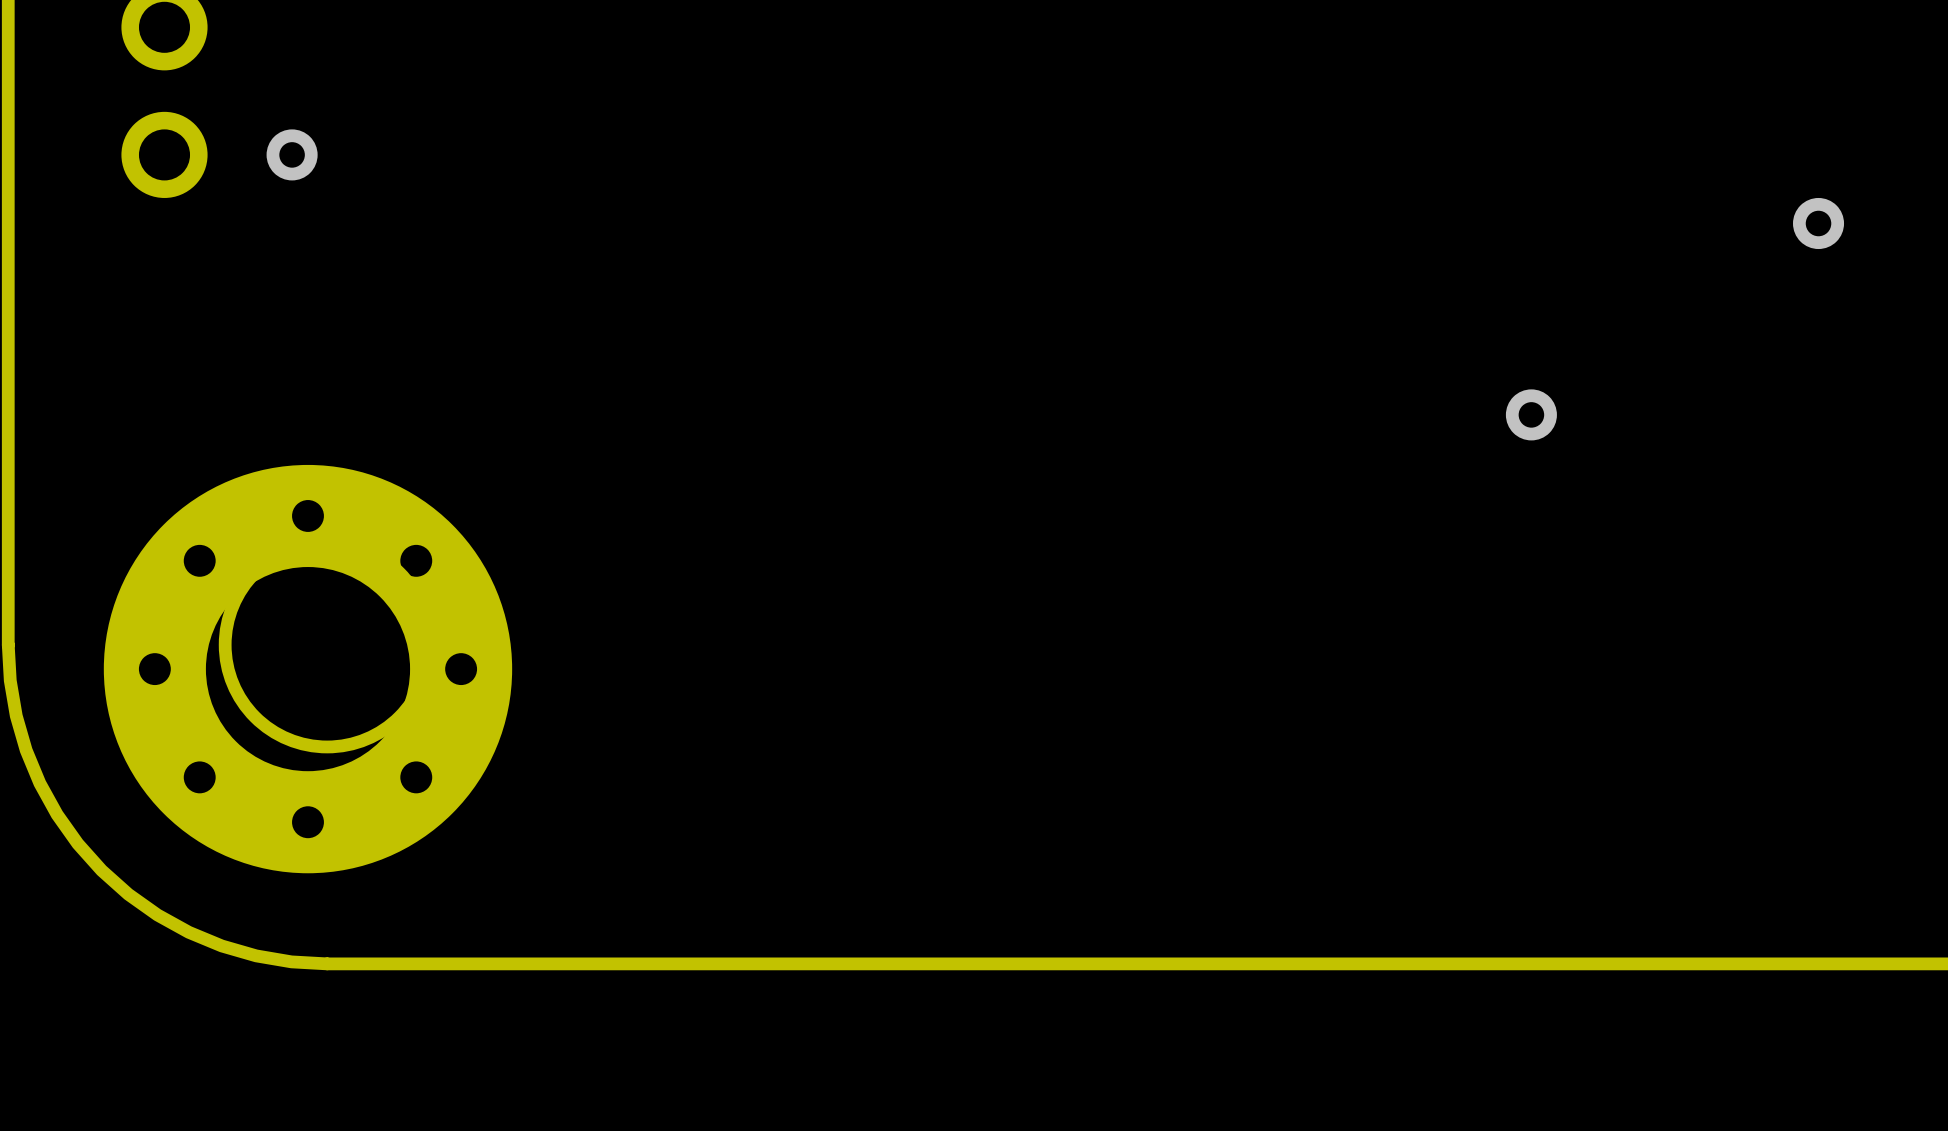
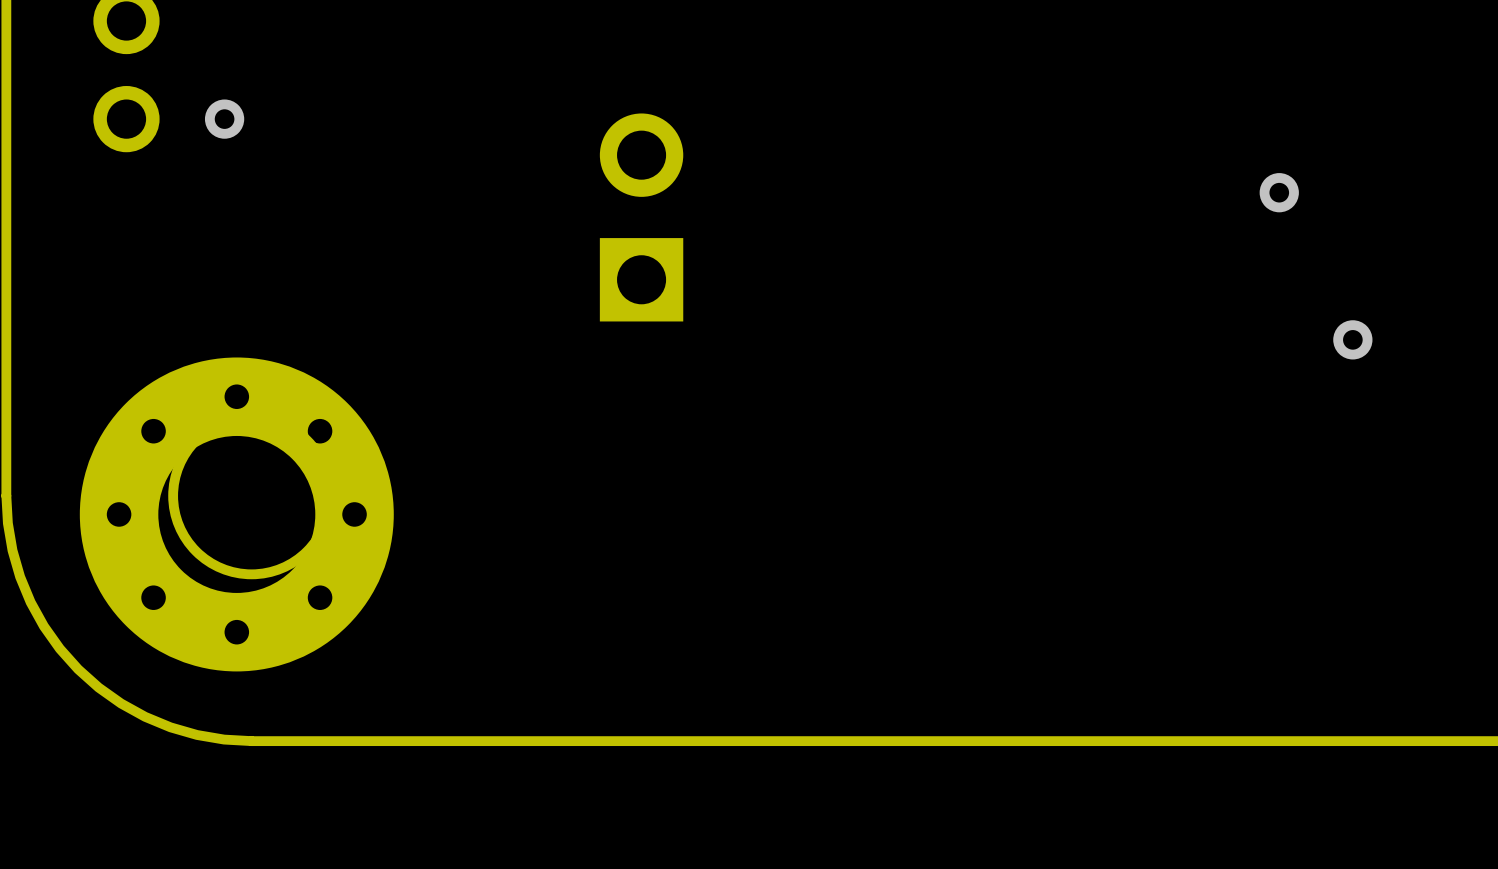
via: (1818, 223) -> none
via: none -> (1279, 192)
part: none -> (641, 217)
via: (1531, 414) -> none
via: none -> (1352, 339)

